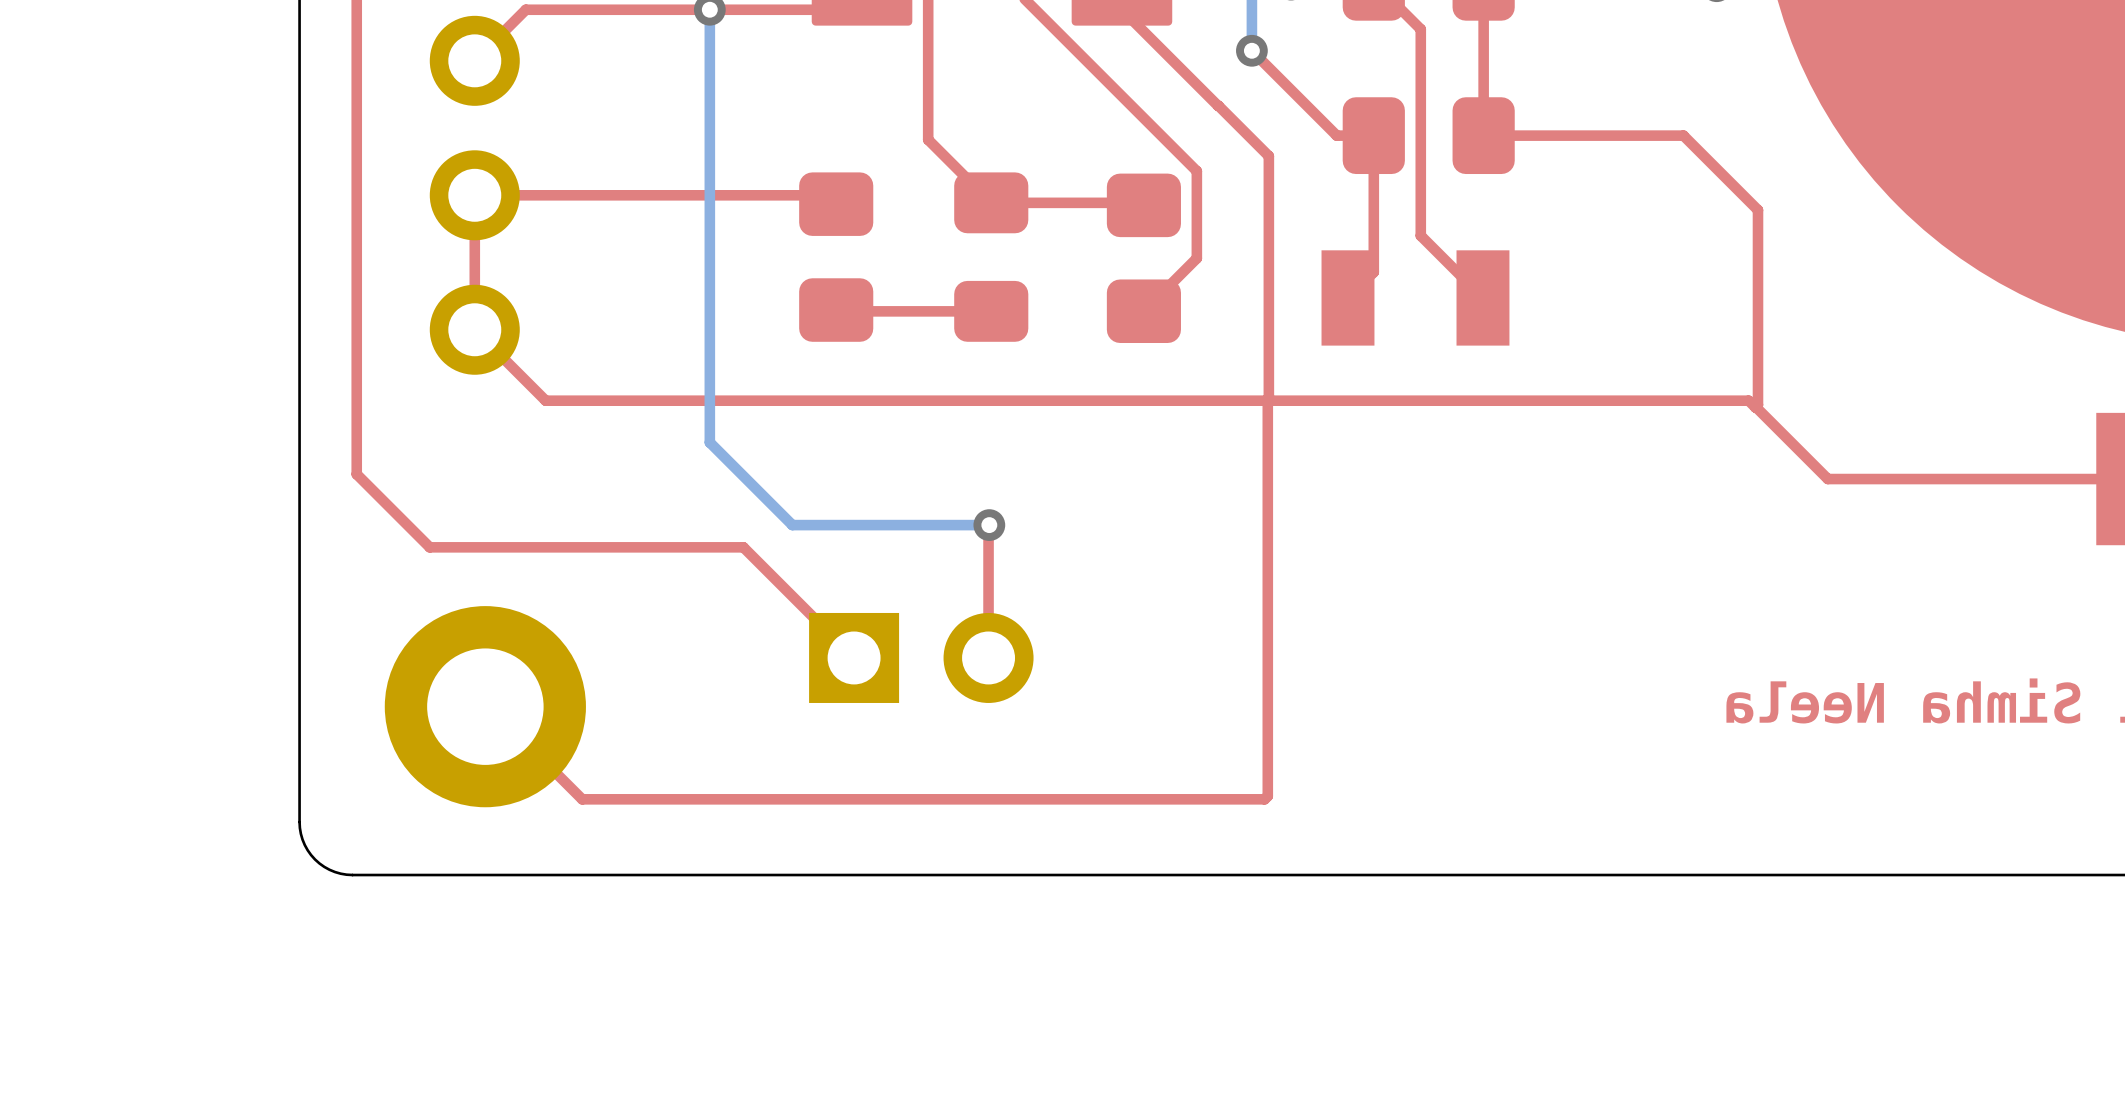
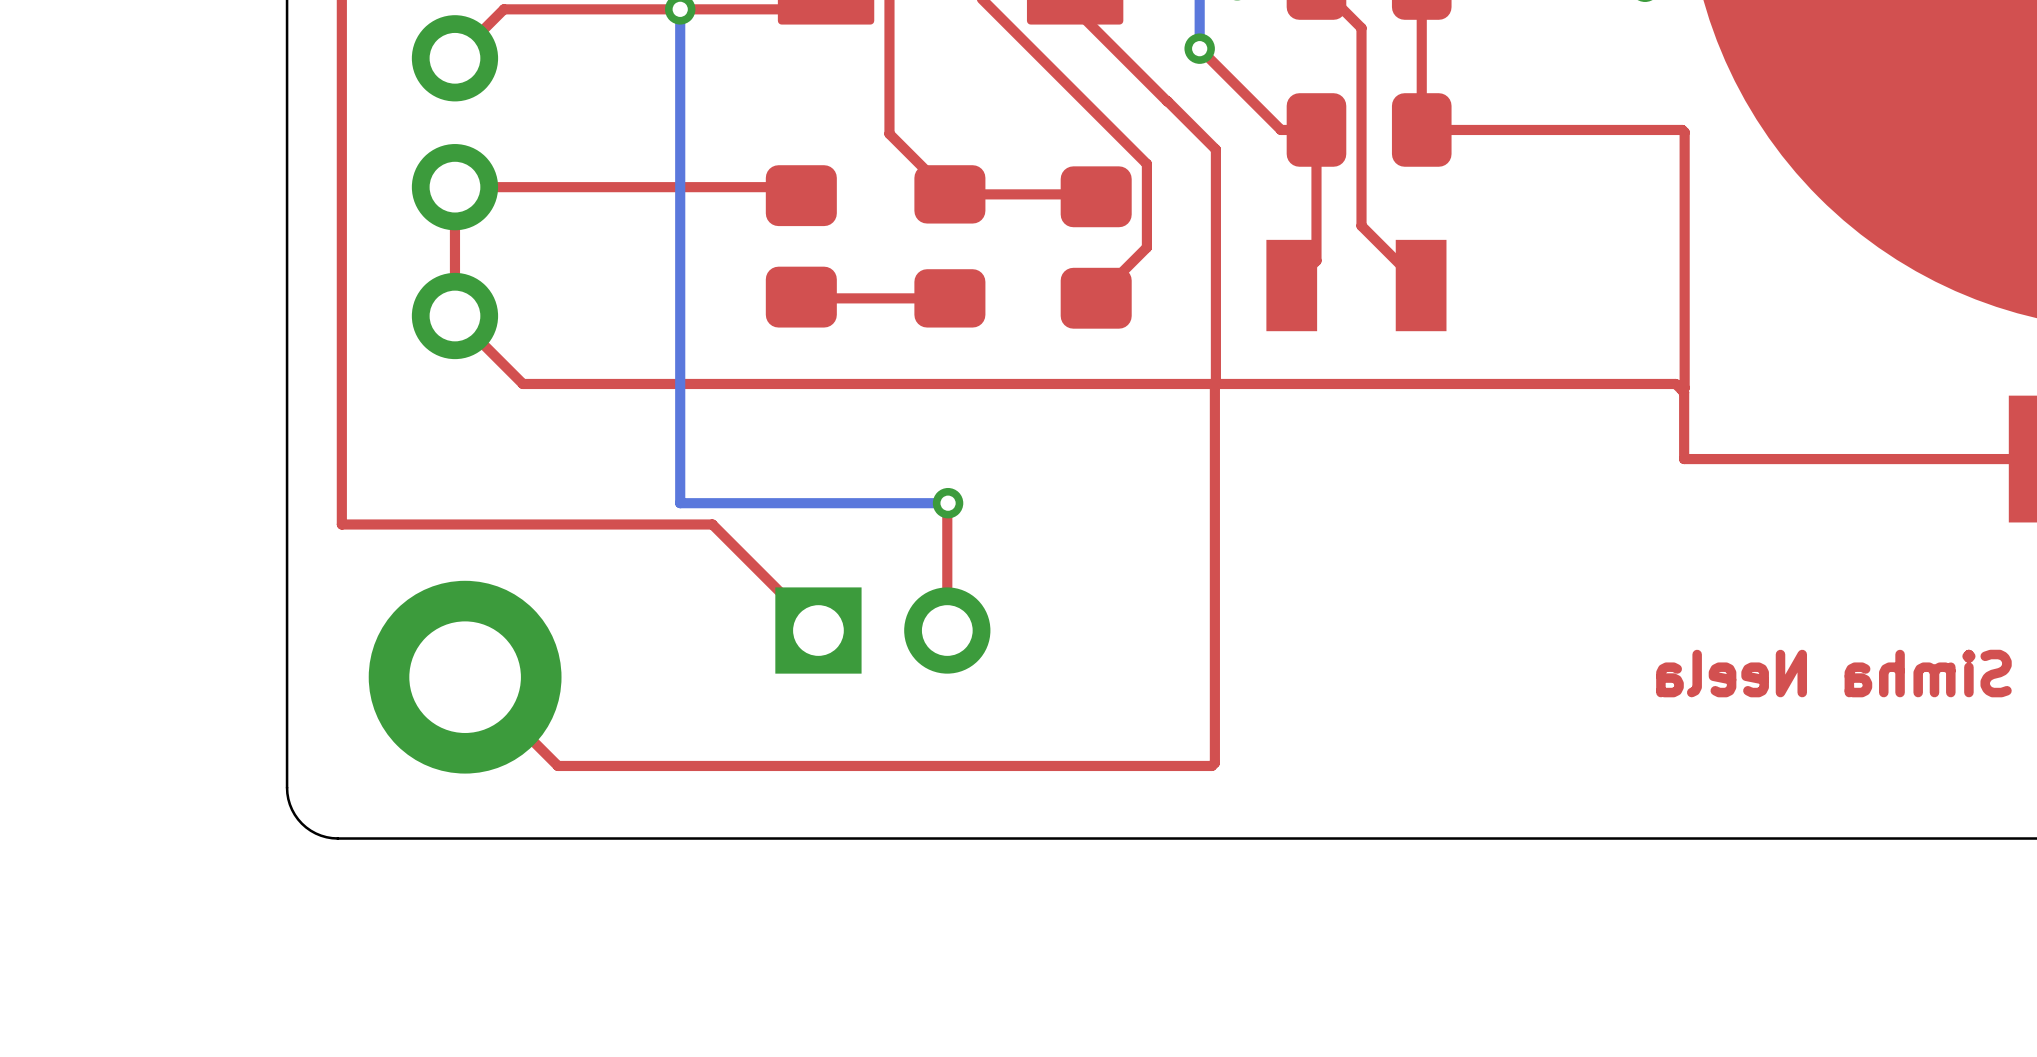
top track: (1683, 135) (1757, 210) -> (1613, 129) (1682, 129) (1684, 132) (1684, 201)
top track: (1756, 407) (1827, 479) -> (1682, 390) (1684, 392) (1684, 459) (1751, 459)
bottom track: (709, 442) (792, 525) -> (680, 424) (680, 503) (759, 503)
top track: (356, 474) (429, 547) -> (341, 454) (341, 524) (411, 524)

